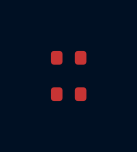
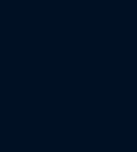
part: (68, 57) -> none
part: (68, 94) -> none

